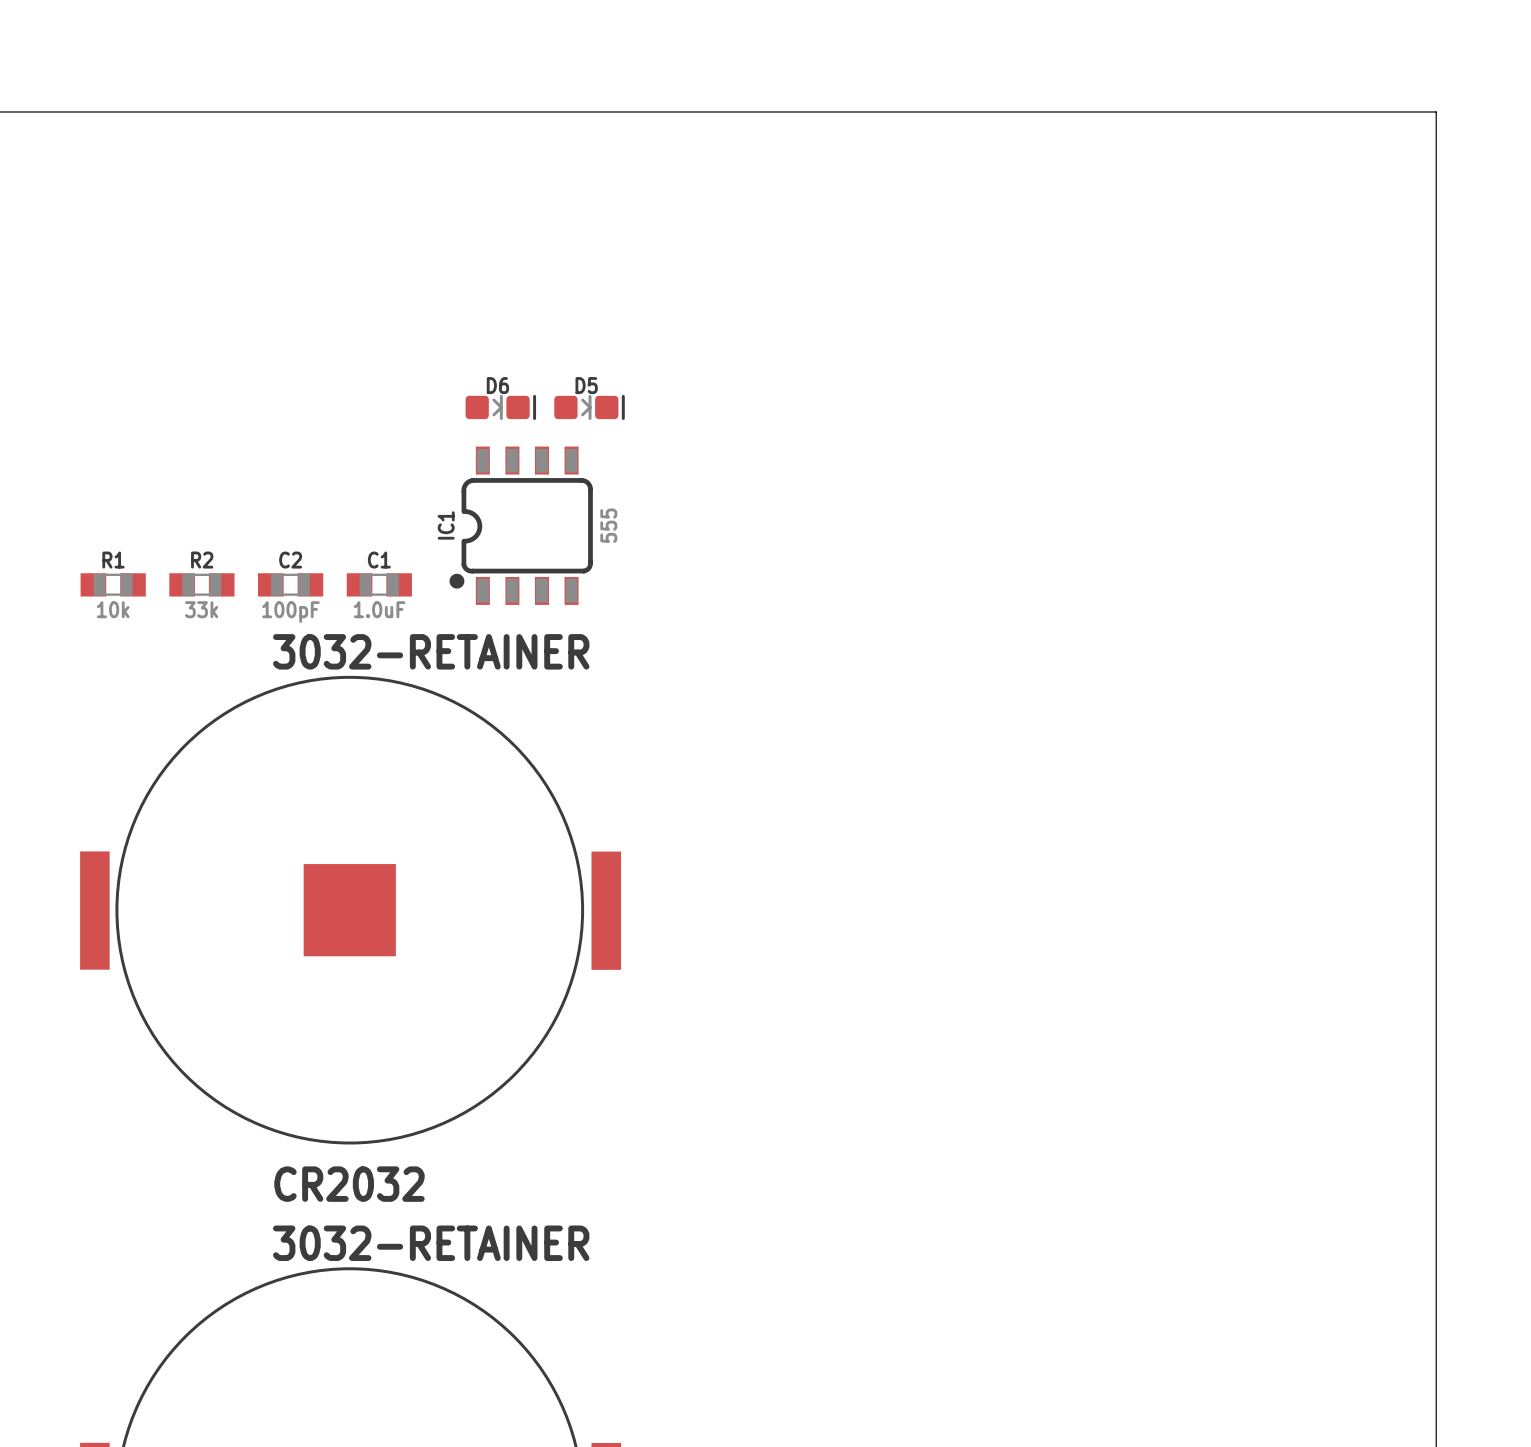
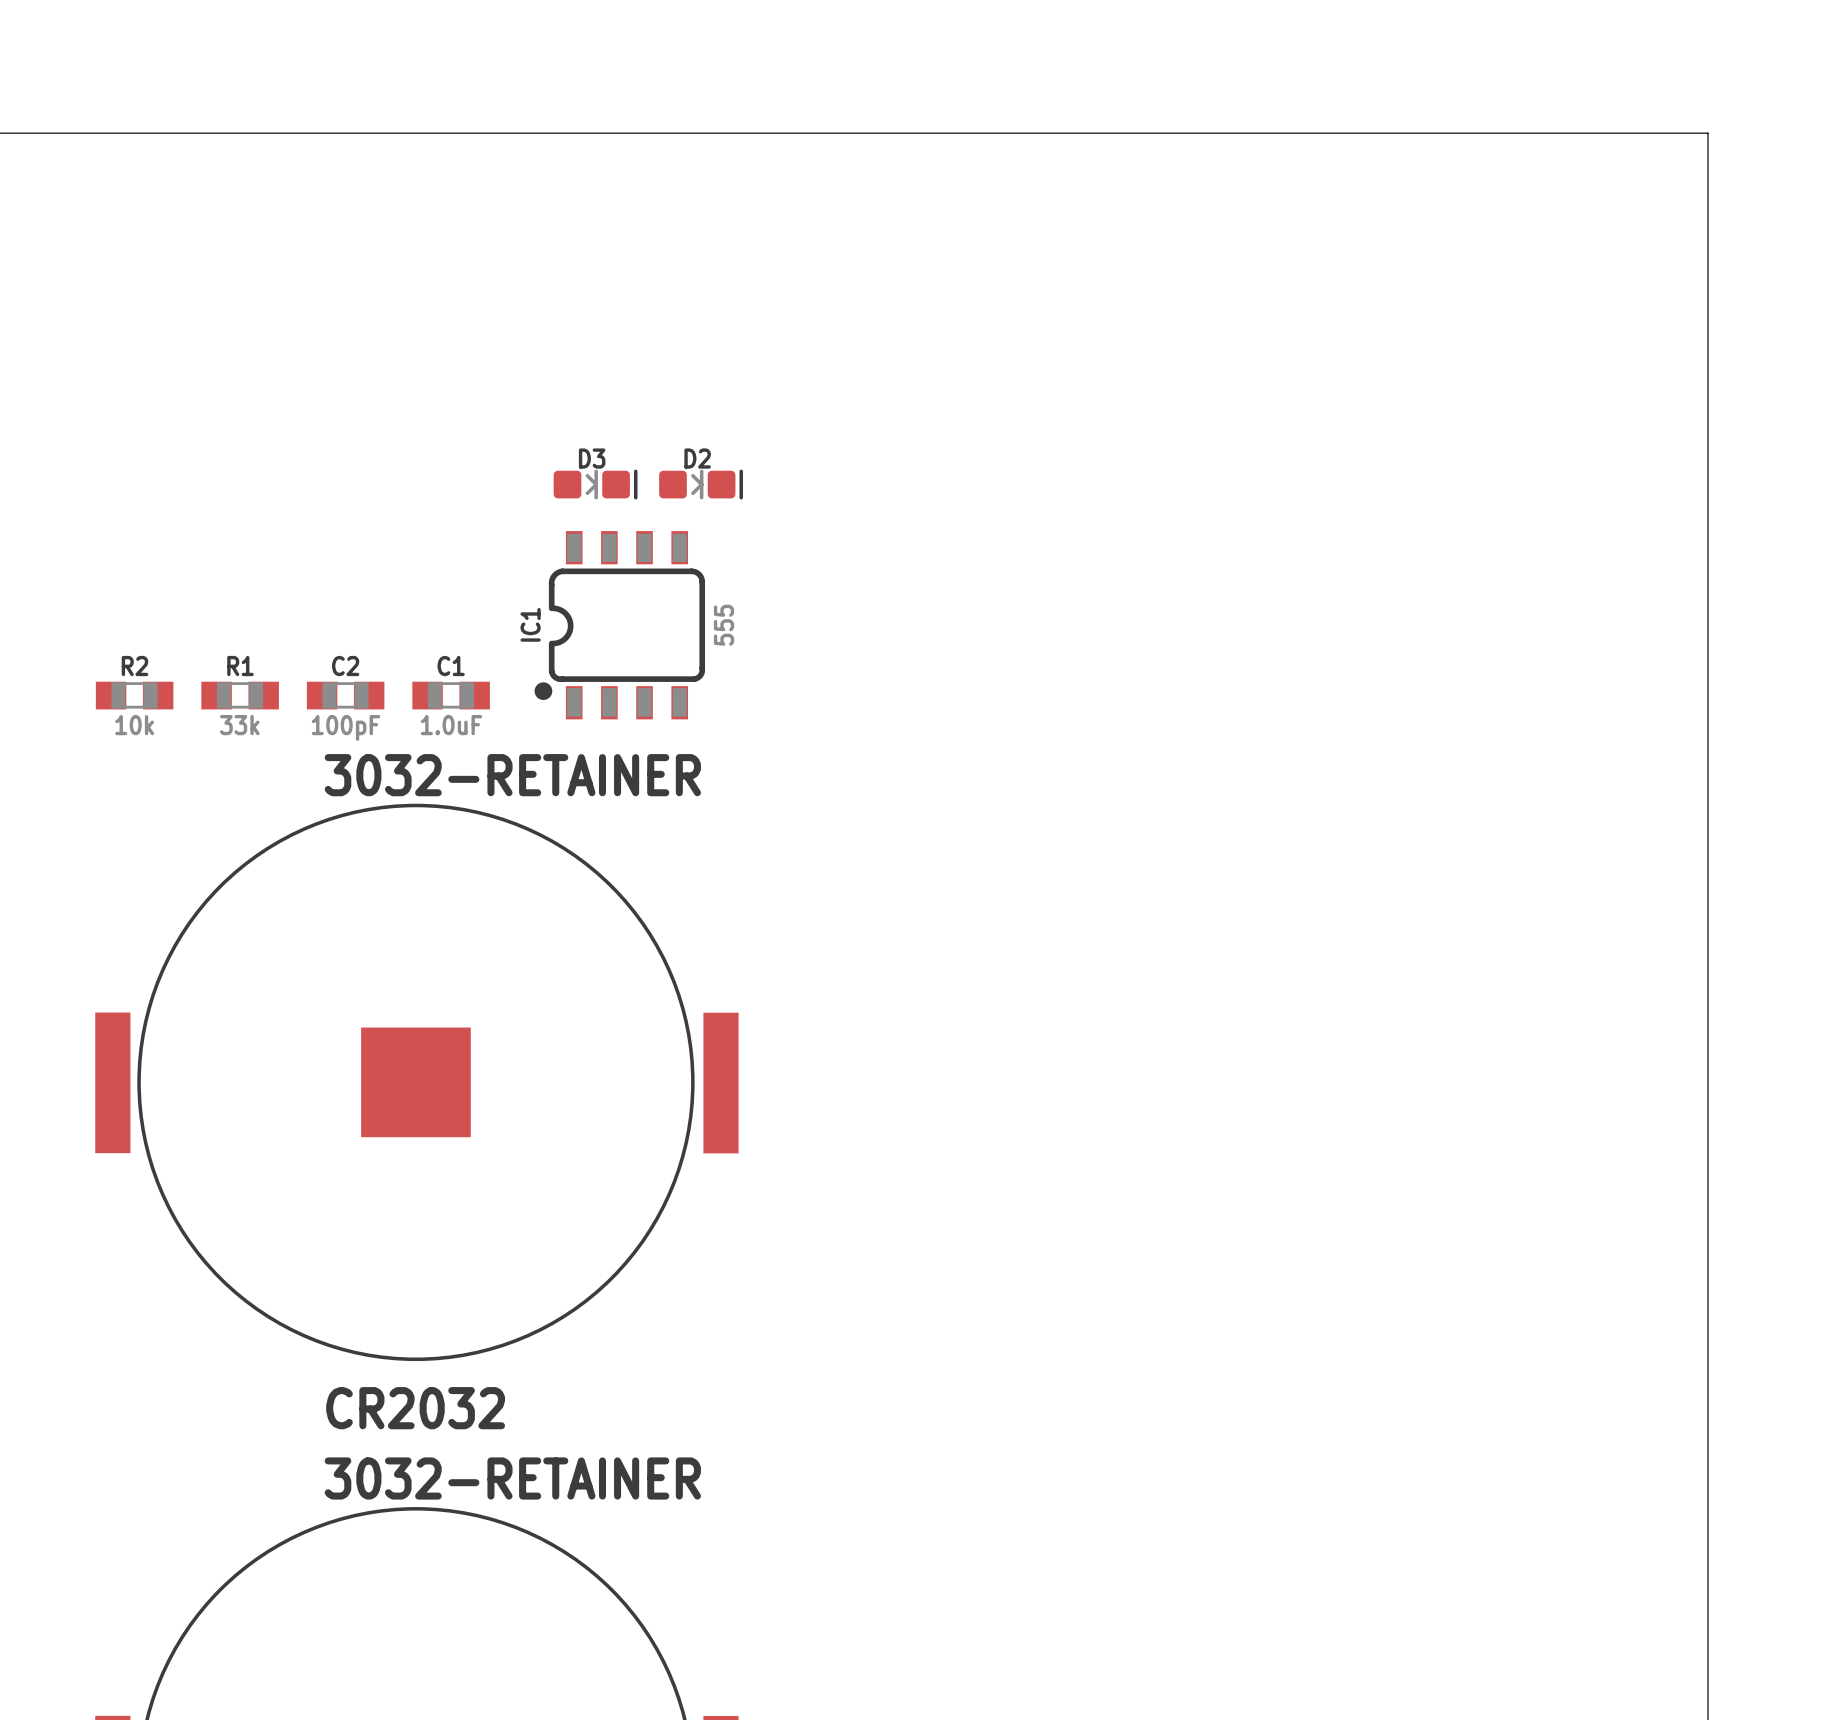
D6 name: D6 (497, 385) -> D3 (592, 458)
D5 name: D5 (586, 385) -> D2 (697, 458)
R1 name: R1 (113, 560) -> R2 (134, 666)
R2 name: R2 (202, 560) -> R1 (240, 666)

